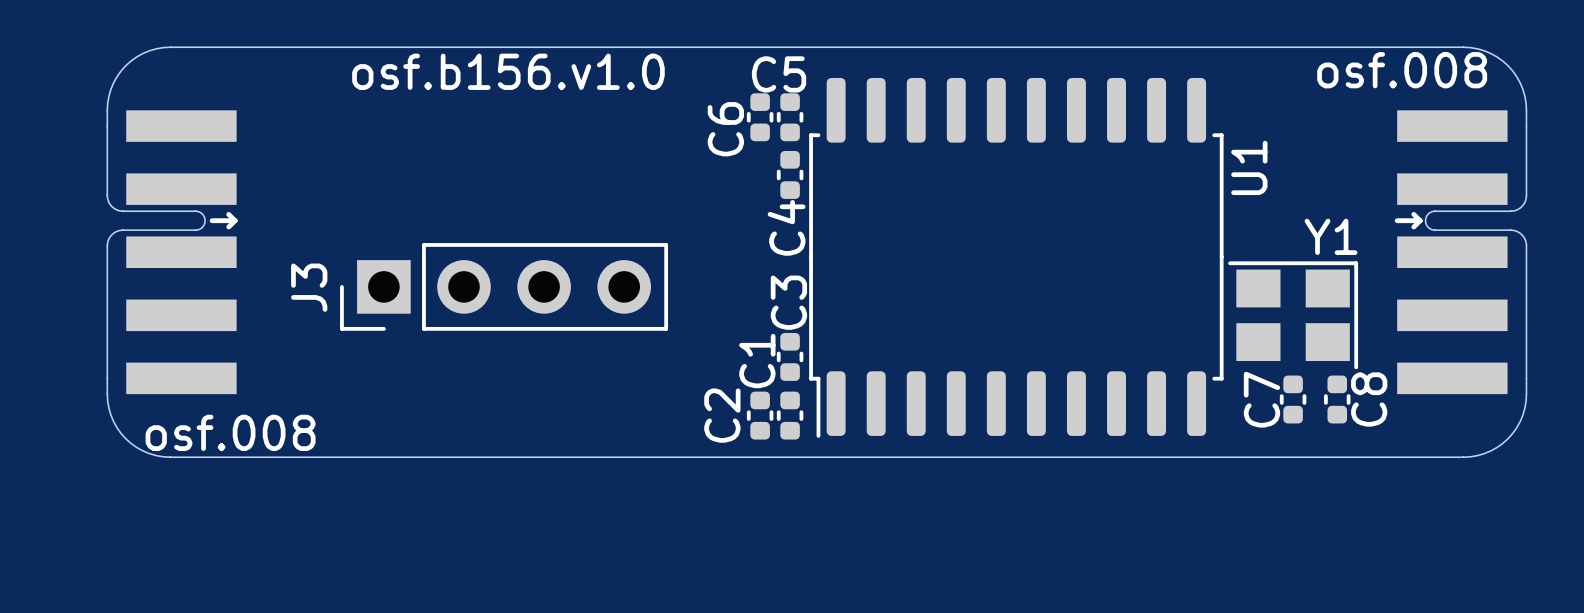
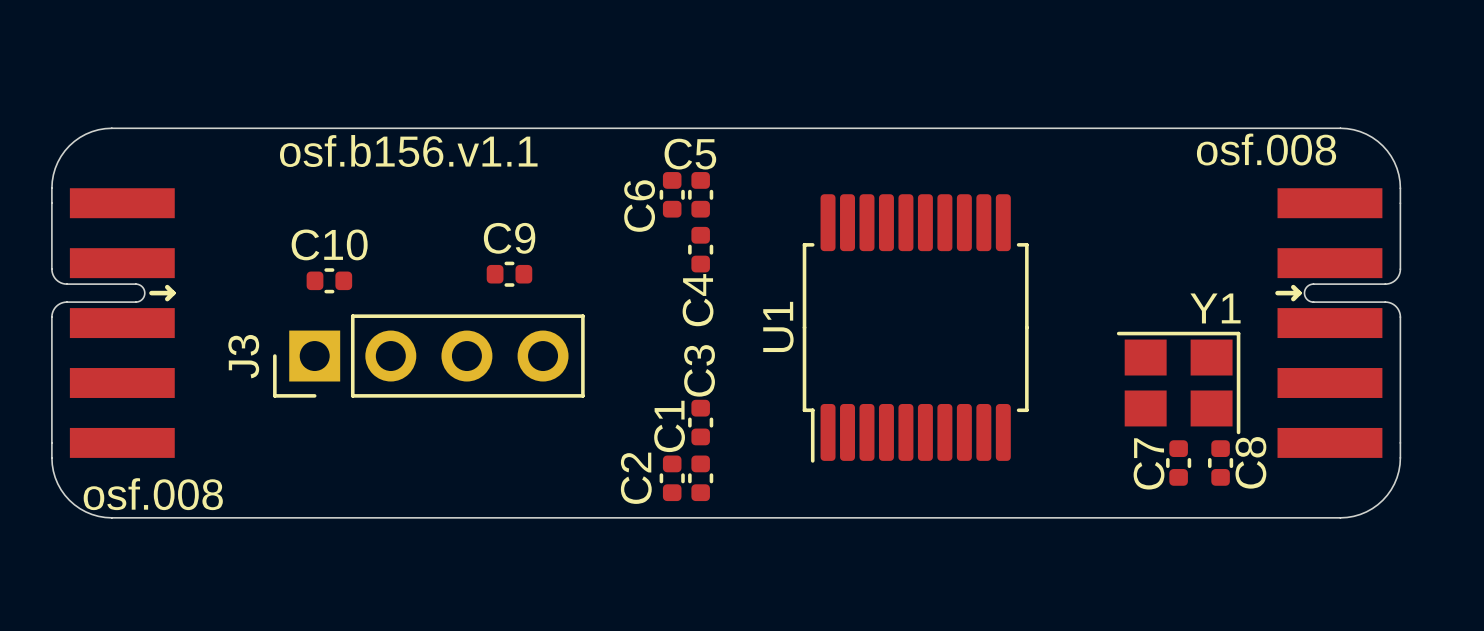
text: osf.b156.v1.0 (508, 71) -> osf.b156.v1.1 (408, 151)
U1 footprint: [809, 77, 1224, 438] -> [802, 194, 1029, 463]
U1 name position: U1 (1249, 167) -> U1 (778, 326)
C9: none -> (509, 274)
C10: none -> (329, 280)

